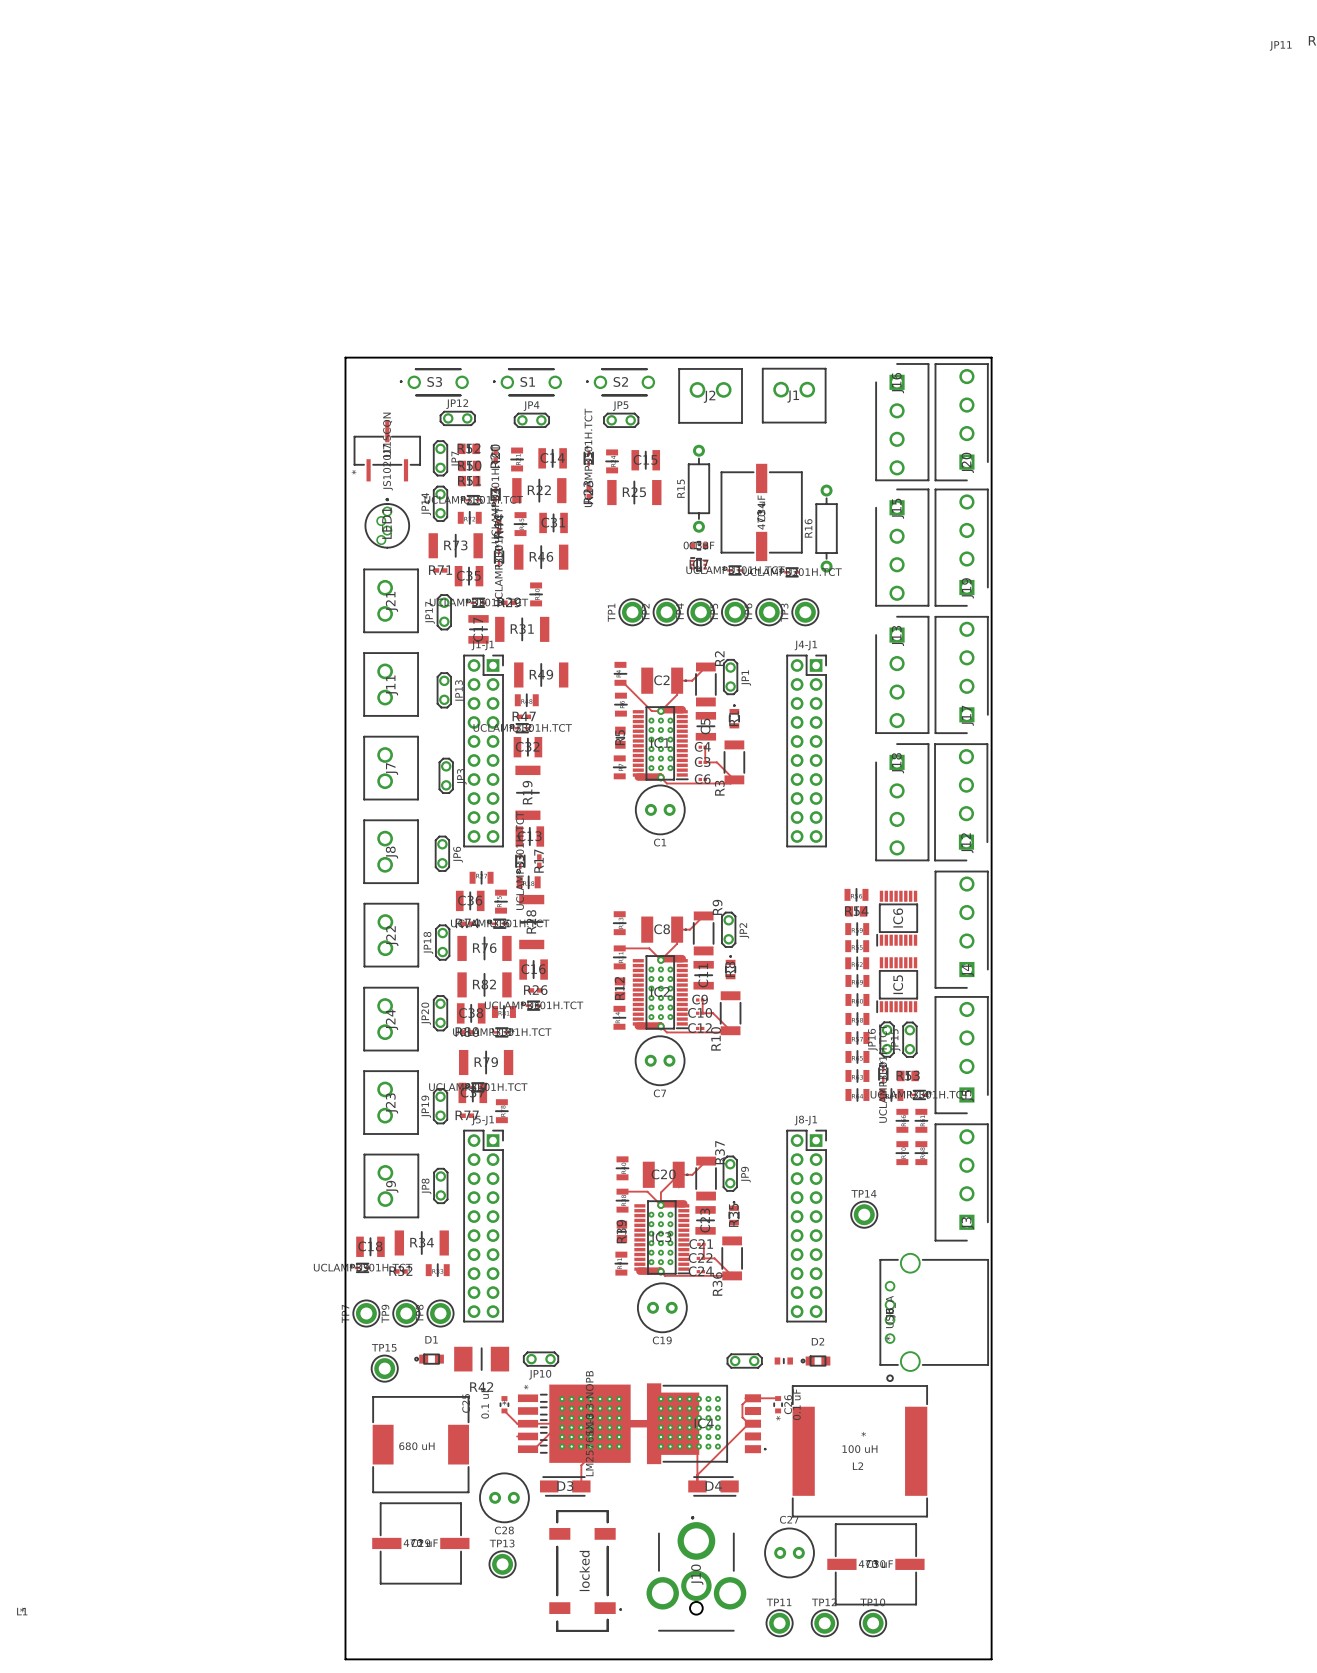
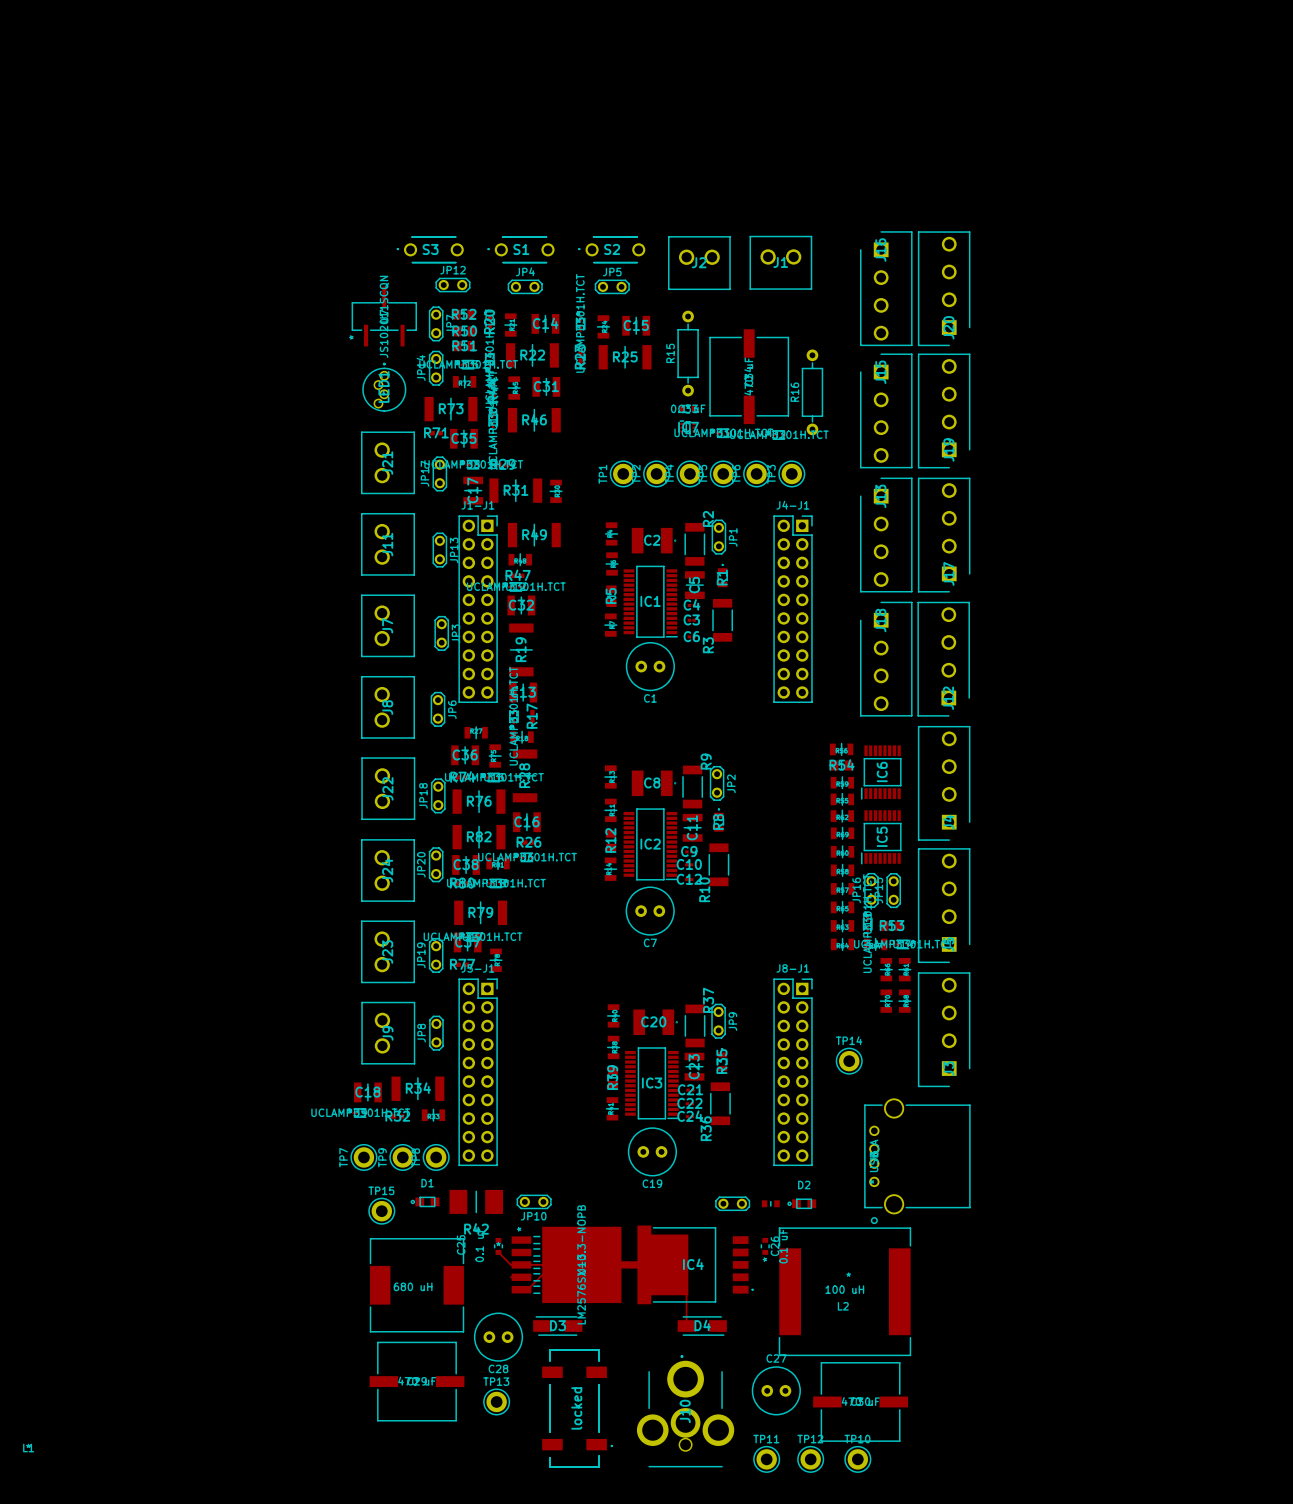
board edge: (345, 357) (991, 357) (991, 1659) (345, 1659) (345, 357) -> none
part position: (536, 594) -> (556, 491)
track: (705, 667) (692, 680) (677, 680) (677, 694) (660, 711) -> none
track: (620, 682) (623, 682) (651, 711) (660, 711) -> none
track: (682, 709) (660, 711) -> none
via: (660, 711) -> none
via: (651, 720) -> none
via: (660, 720) -> none
via: (670, 720) -> none
via: (651, 730) -> none
via: (660, 730) -> none
via: (670, 730) -> none
via: (651, 739) -> none
via: (660, 739) -> none
via: (670, 739) -> none
track: (705, 747) (705, 762) (716, 762) (734, 779) (730, 783) (666, 783) (660, 777) (638, 777) -> none
via: (651, 749) -> none
via: (660, 749) -> none
via: (670, 749) -> none
via: (651, 758) -> none
via: (660, 758) -> none
via: (670, 758) -> none
via: (651, 768) -> none
via: (660, 768) -> none
via: (670, 768) -> none
via: (660, 777) -> none
track: (703, 915) (689, 929) (677, 929) (677, 943) (660, 960) -> none
track: (619, 948) (649, 948) (660, 960) -> none
track: (682, 958) (660, 960) -> none
via: (660, 960) -> none
via: (651, 969) -> none
via: (660, 969) -> none
via: (670, 969) -> none
via: (651, 979) -> none
via: (660, 979) -> none
via: (670, 979) -> none
via: (651, 988) -> none
via: (660, 988) -> none
via: (670, 988) -> none
via: (651, 998) -> none
via: (660, 998) -> none
via: (670, 998) -> none
track: (702, 999) (702, 1013) (713, 1013) (730, 1030) (728, 1032) (666, 1032) (660, 1026) (638, 1026) -> none
via: (651, 1007) -> none
via: (660, 1007) -> none
via: (670, 1007) -> none
via: (651, 1017) -> none
via: (660, 1017) -> none
via: (670, 1017) -> none
via: (660, 1026) -> none
track: (706, 1161) (692, 1174) (678, 1174) -> none
track: (678, 1174) (660, 1192) (660, 1205) -> none
track: (622, 1191) (647, 1191) (660, 1205) -> none
track: (683, 1203) (660, 1205) -> none
via: (660, 1205) -> none
via: (651, 1214) -> none
via: (660, 1214) -> none
via: (670, 1214) -> none
via: (651, 1224) -> none
via: (660, 1224) -> none
via: (670, 1224) -> none
via: (651, 1233) -> none
via: (660, 1233) -> none
via: (670, 1233) -> none
via: (651, 1243) -> none
via: (660, 1243) -> none
via: (670, 1243) -> none
track: (703, 1244) (703, 1258) (714, 1258) (732, 1275) -> none
via: (651, 1252) -> none
via: (660, 1252) -> none
via: (670, 1252) -> none
via: (651, 1262) -> none
via: (660, 1262) -> none
via: (670, 1262) -> none
track: (639, 1271) (660, 1271) (665, 1275) (732, 1275) -> none
via: (660, 1271) -> none
track: (745, 1398) (778, 1398) -> none
track: (748, 1398) (742, 1404) (742, 1417) (748, 1423) -> none
via: (562, 1399) -> none
via: (571, 1399) -> none
via: (581, 1399) -> none
via: (590, 1399) -> none
via: (600, 1399) -> none
via: (609, 1399) -> none
via: (619, 1399) -> none
via: (660, 1399) -> none
via: (670, 1399) -> none
via: (679, 1399) -> none
via: (689, 1399) -> none
via: (698, 1399) -> none
via: (708, 1399) -> none
via: (717, 1399) -> none
via: (562, 1408) -> none
via: (571, 1408) -> none
via: (581, 1408) -> none
via: (590, 1408) -> none
via: (600, 1408) -> none
via: (609, 1408) -> none
via: (619, 1408) -> none
via: (660, 1408) -> none
via: (670, 1408) -> none
via: (679, 1408) -> none
via: (689, 1408) -> none
via: (698, 1408) -> none
via: (708, 1408) -> none
via: (717, 1408) -> none
via: (562, 1418) -> none
via: (571, 1418) -> none
via: (581, 1418) -> none
via: (590, 1418) -> none
via: (600, 1418) -> none
via: (609, 1418) -> none
via: (619, 1418) -> none
via: (660, 1418) -> none
via: (670, 1418) -> none
via: (679, 1418) -> none
via: (689, 1418) -> none
via: (698, 1418) -> none
via: (708, 1418) -> none
via: (717, 1418) -> none
track: (748, 1423) (697, 1475) -> none
via: (562, 1427) -> none
via: (571, 1427) -> none
via: (581, 1427) -> none
via: (590, 1427) -> none
via: (600, 1427) -> none
via: (609, 1427) -> none
via: (619, 1427) -> none
via: (660, 1427) -> none
via: (670, 1427) -> none
via: (679, 1427) -> none
via: (689, 1427) -> none
via: (698, 1427) -> none
via: (708, 1427) -> none
via: (717, 1427) -> none
via: (562, 1437) -> none
via: (571, 1437) -> none
via: (581, 1437) -> none
via: (590, 1437) -> none
via: (600, 1437) -> none
via: (609, 1437) -> none
via: (619, 1437) -> none
via: (660, 1437) -> none
via: (670, 1437) -> none
via: (679, 1437) -> none
via: (689, 1437) -> none
via: (698, 1437) -> none
via: (708, 1437) -> none
via: (717, 1437) -> none
via: (562, 1446) -> none
via: (571, 1446) -> none
via: (581, 1446) -> none
via: (590, 1446) -> none
via: (600, 1446) -> none
via: (609, 1446) -> none
via: (619, 1446) -> none
via: (660, 1446) -> none
via: (670, 1446) -> none
via: (679, 1446) -> none
via: (689, 1446) -> none
via: (698, 1446) -> none
via: (708, 1446) -> none
via: (717, 1446) -> none
track: (590, 1456) (581, 1465) (581, 1486) -> none

